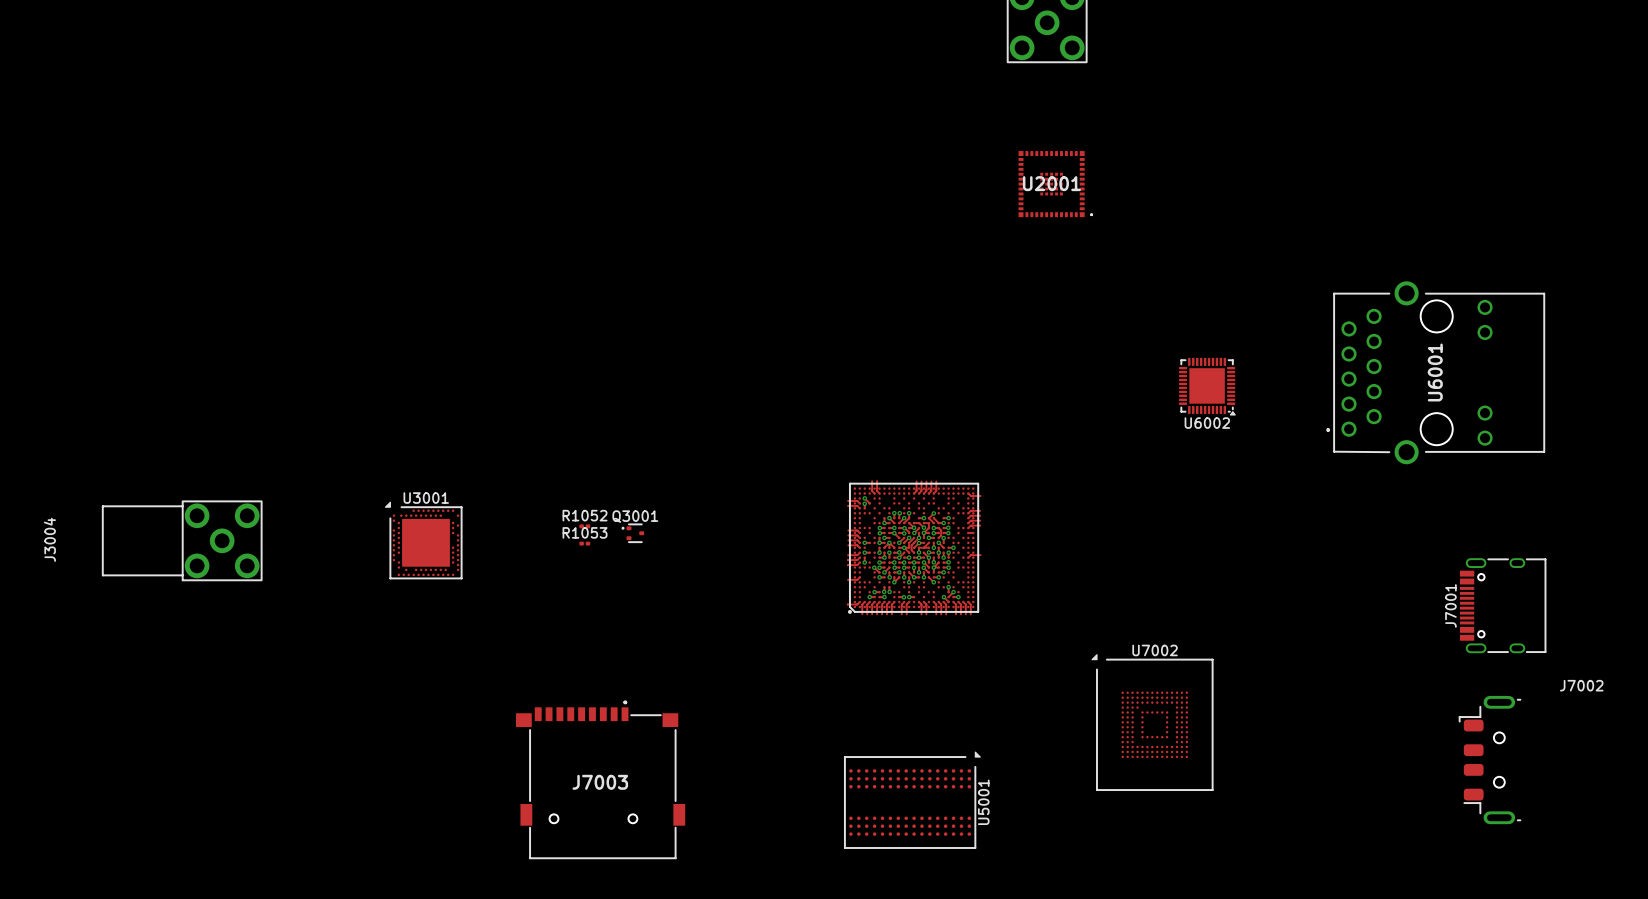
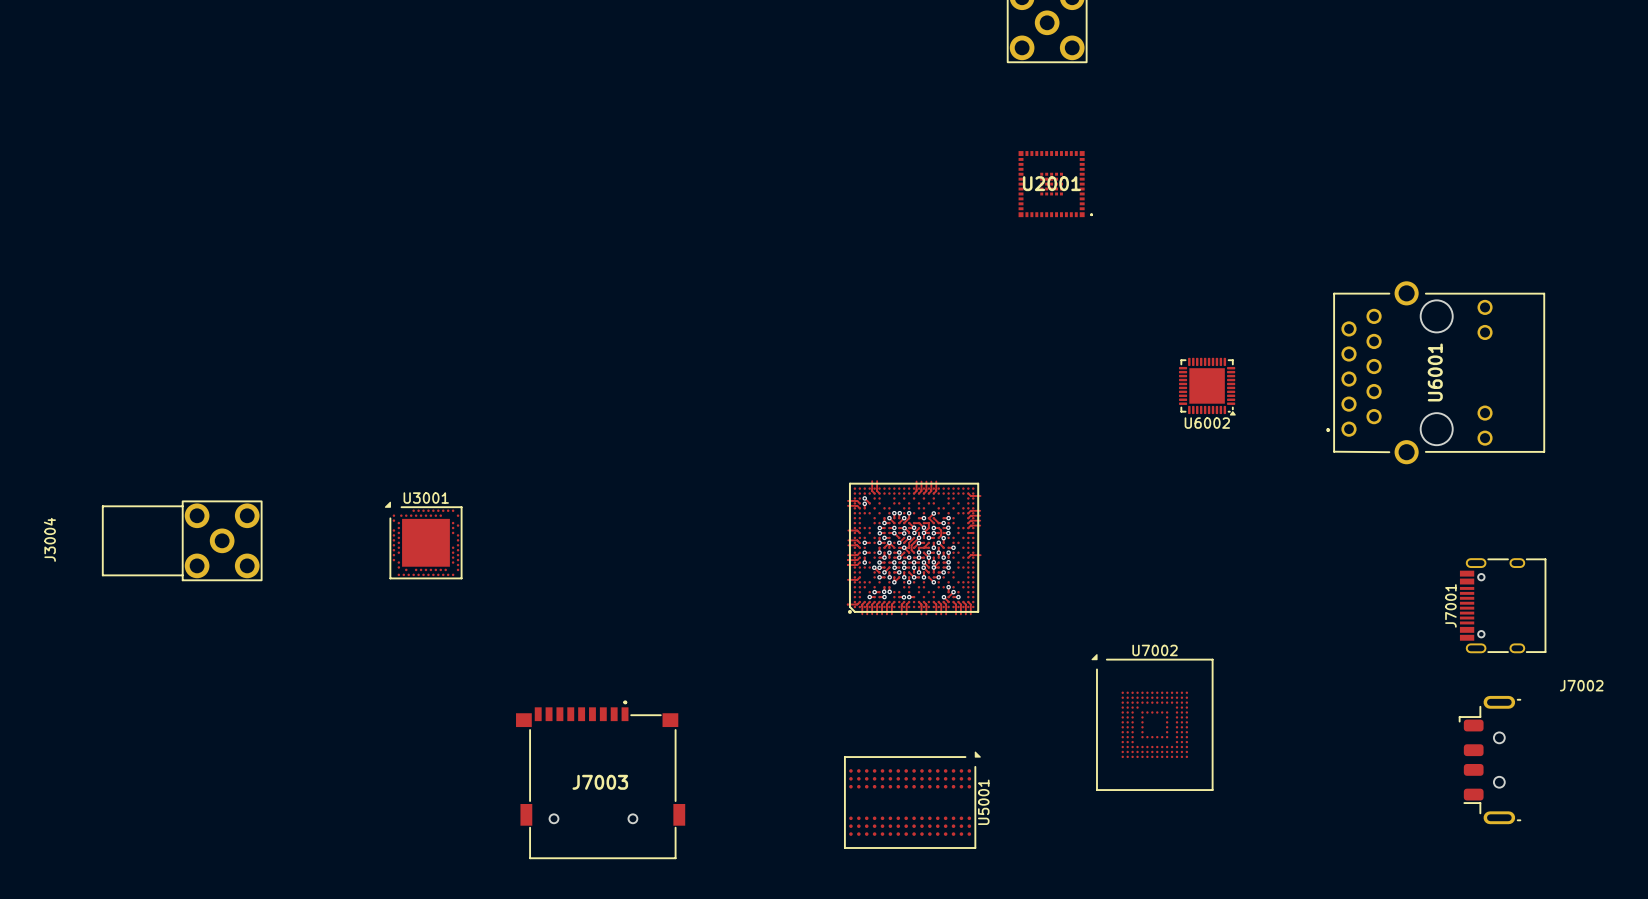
R1052: (584, 526) -> none
Q3001: (632, 533) -> none
top track: (848, 535) (857, 535) (859, 537) -> none
R1053: (584, 543) -> none

